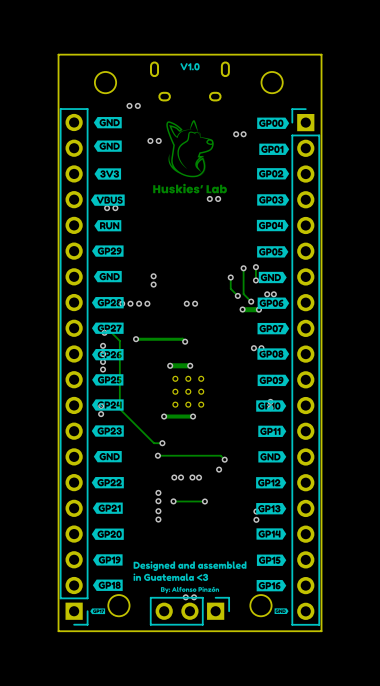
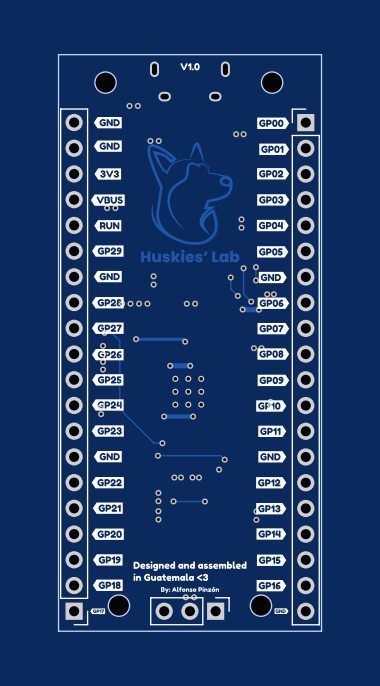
drawing: [166, 120, 214, 178] -> none
drawing shape: [153, 183, 227, 194] -> [147, 142, 233, 245]
via: (209, 198) -> none
via: (218, 198) -> none
via: none -> (241, 219)
via: none -> (241, 227)
drawing: none -> [141, 249, 240, 263]

